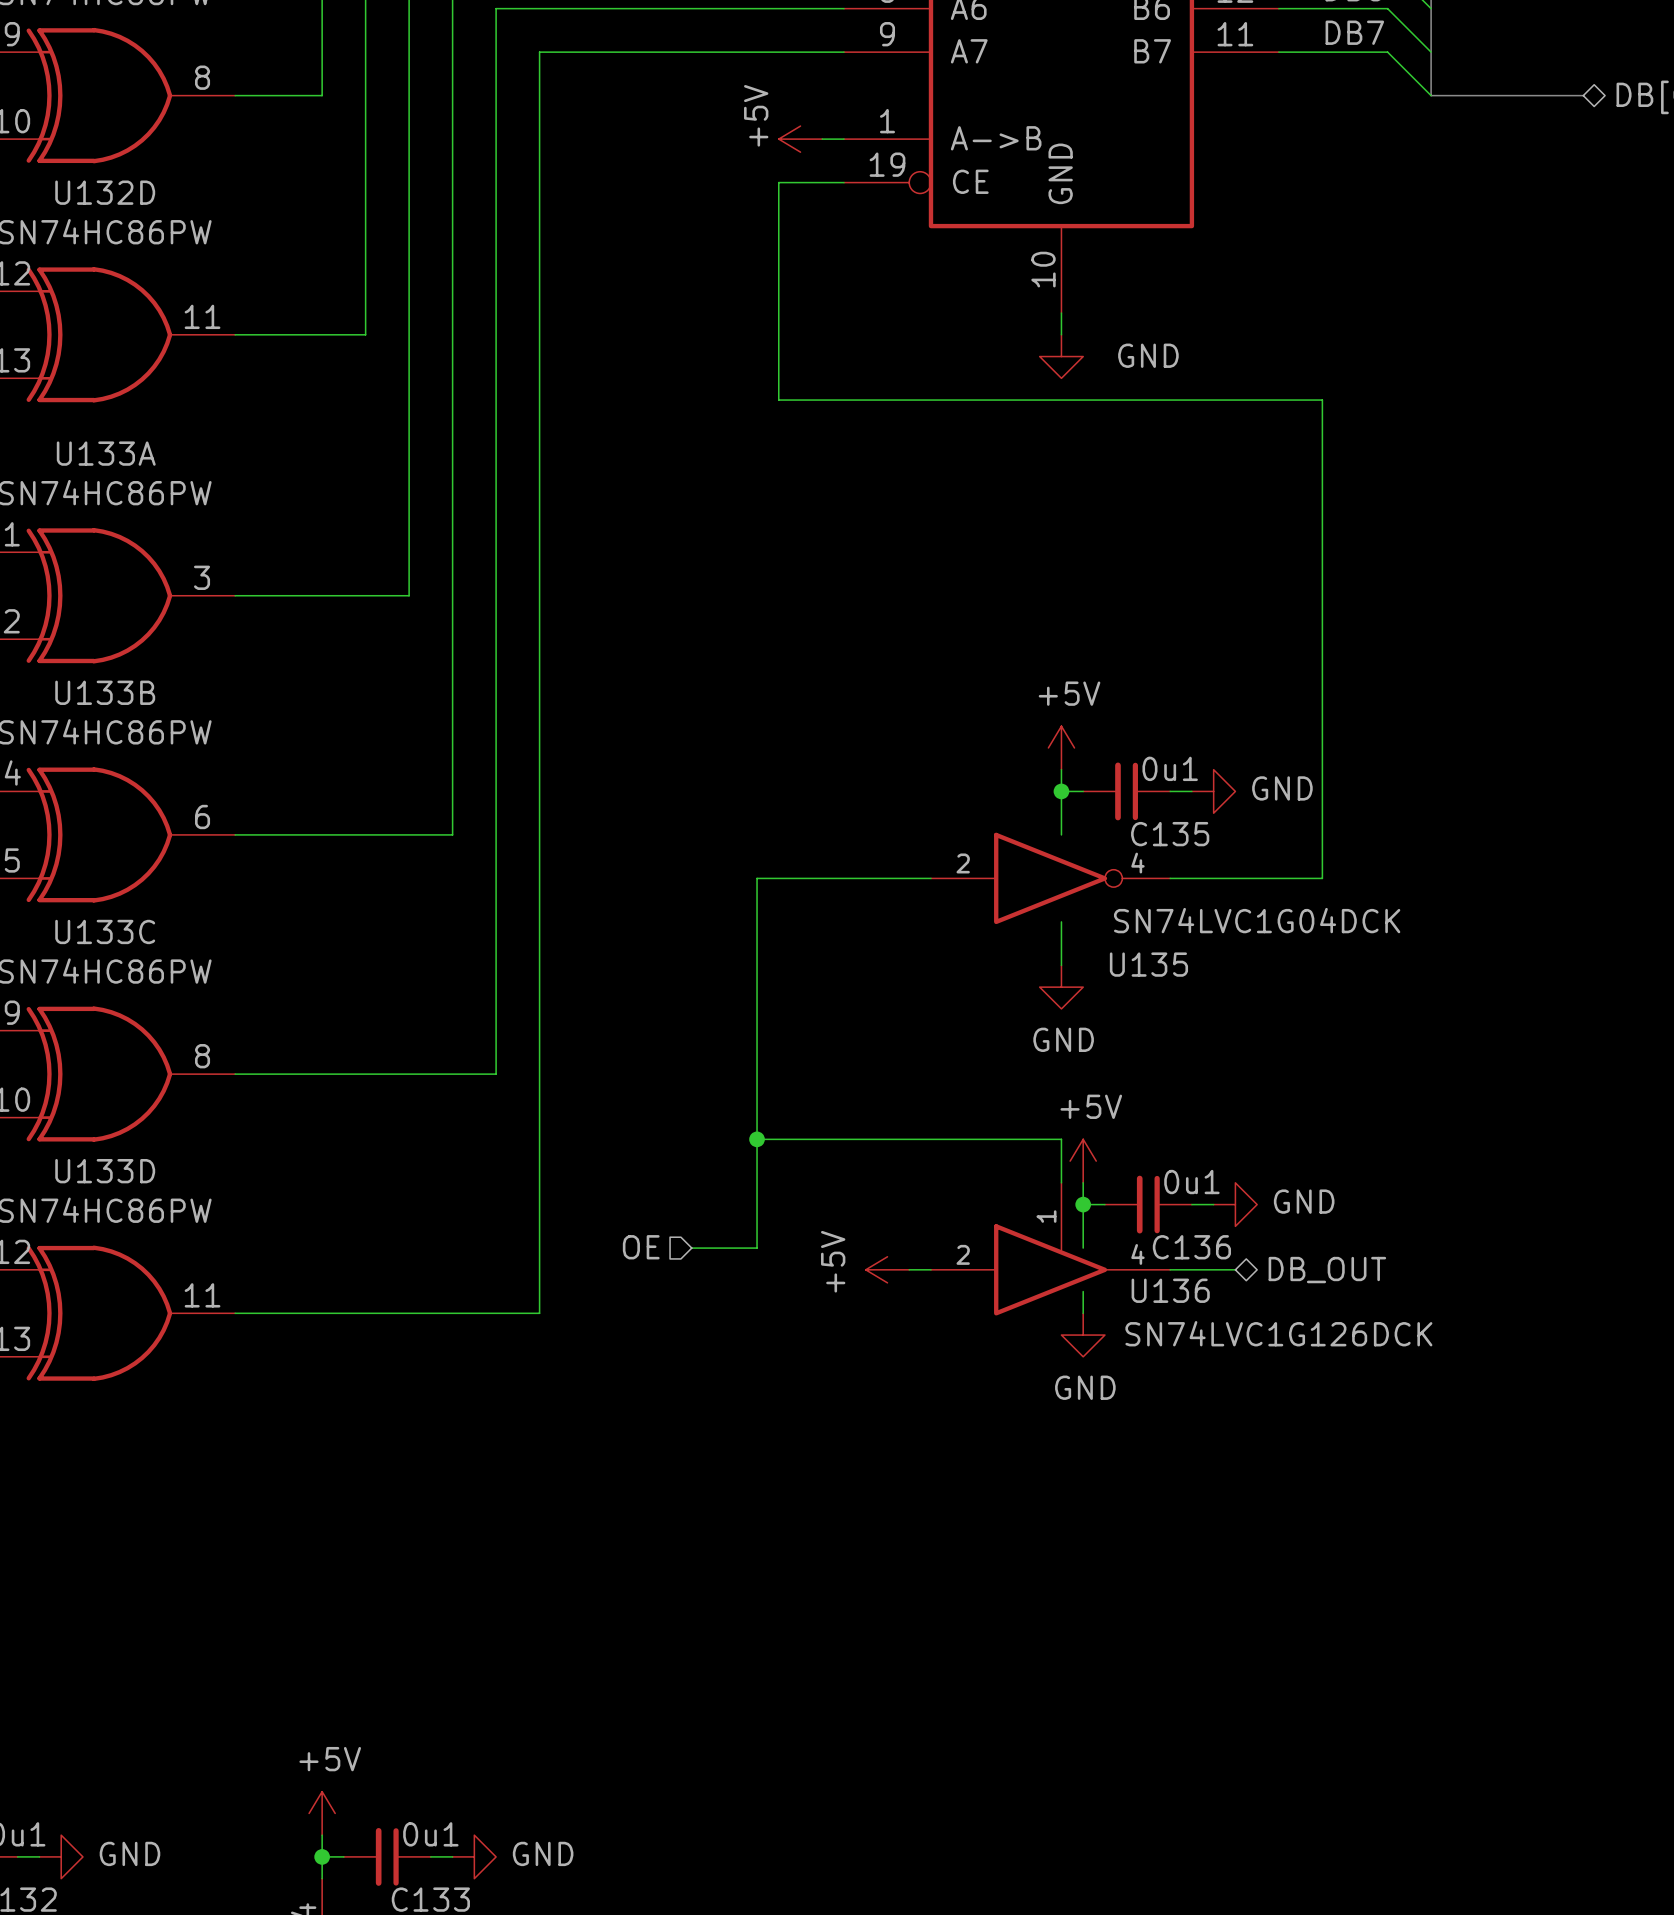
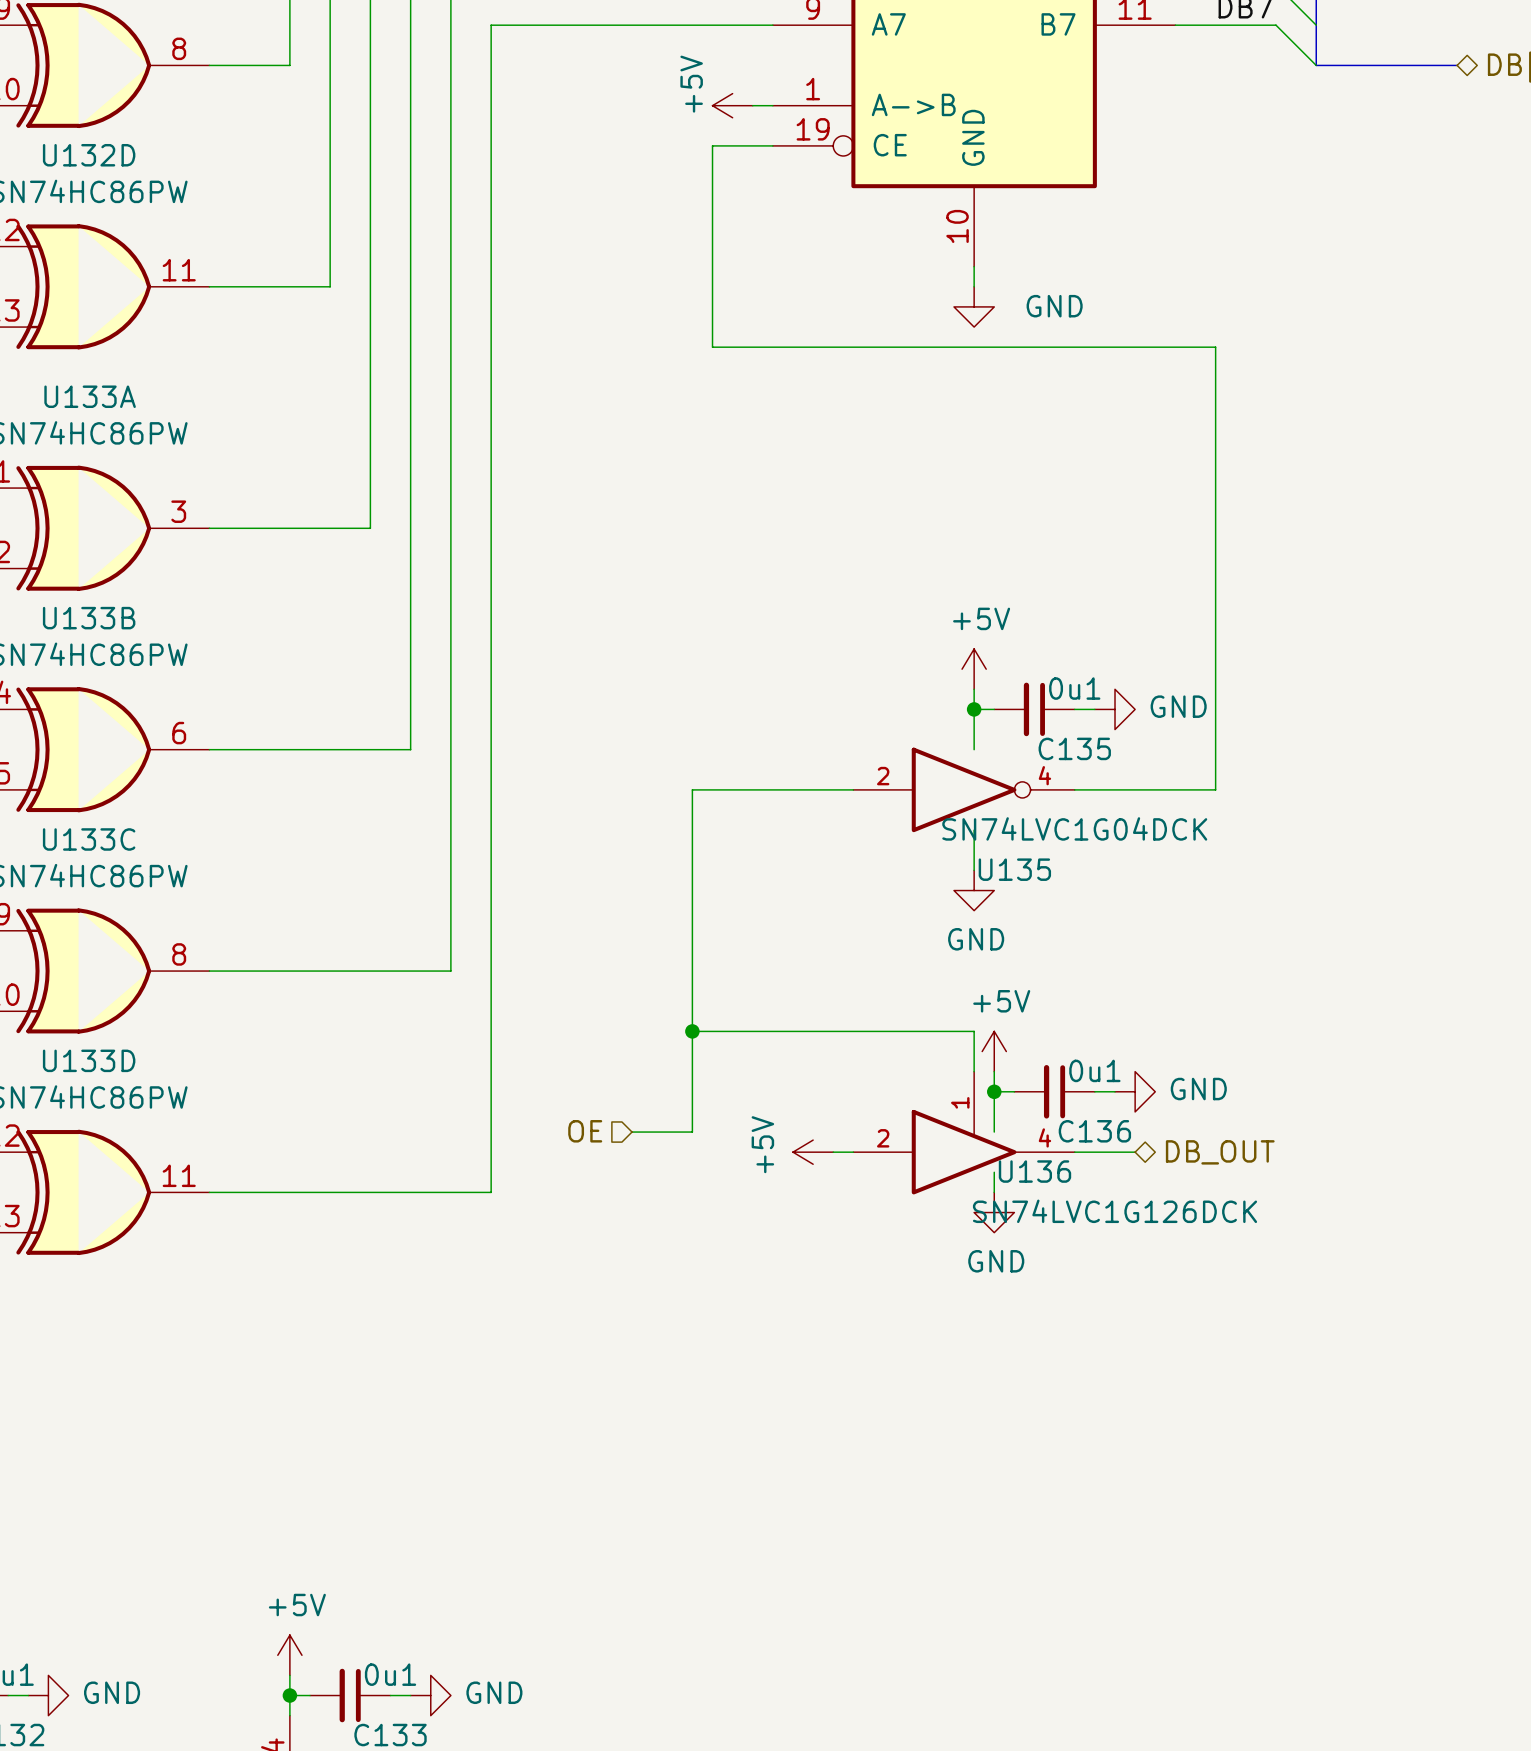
U135 value position: SN74LVC1G04DCK (1257, 920) -> SN74LVC1G04DCK (1074, 828)
U135 name position: U135 (1148, 964) -> U135 (1014, 869)
U136 name position: U136 (1170, 1290) -> U136 (1034, 1171)
U136 value position: SN74LVC1G126DCK (1278, 1333) -> SN74LVC1G126DCK (1115, 1211)

